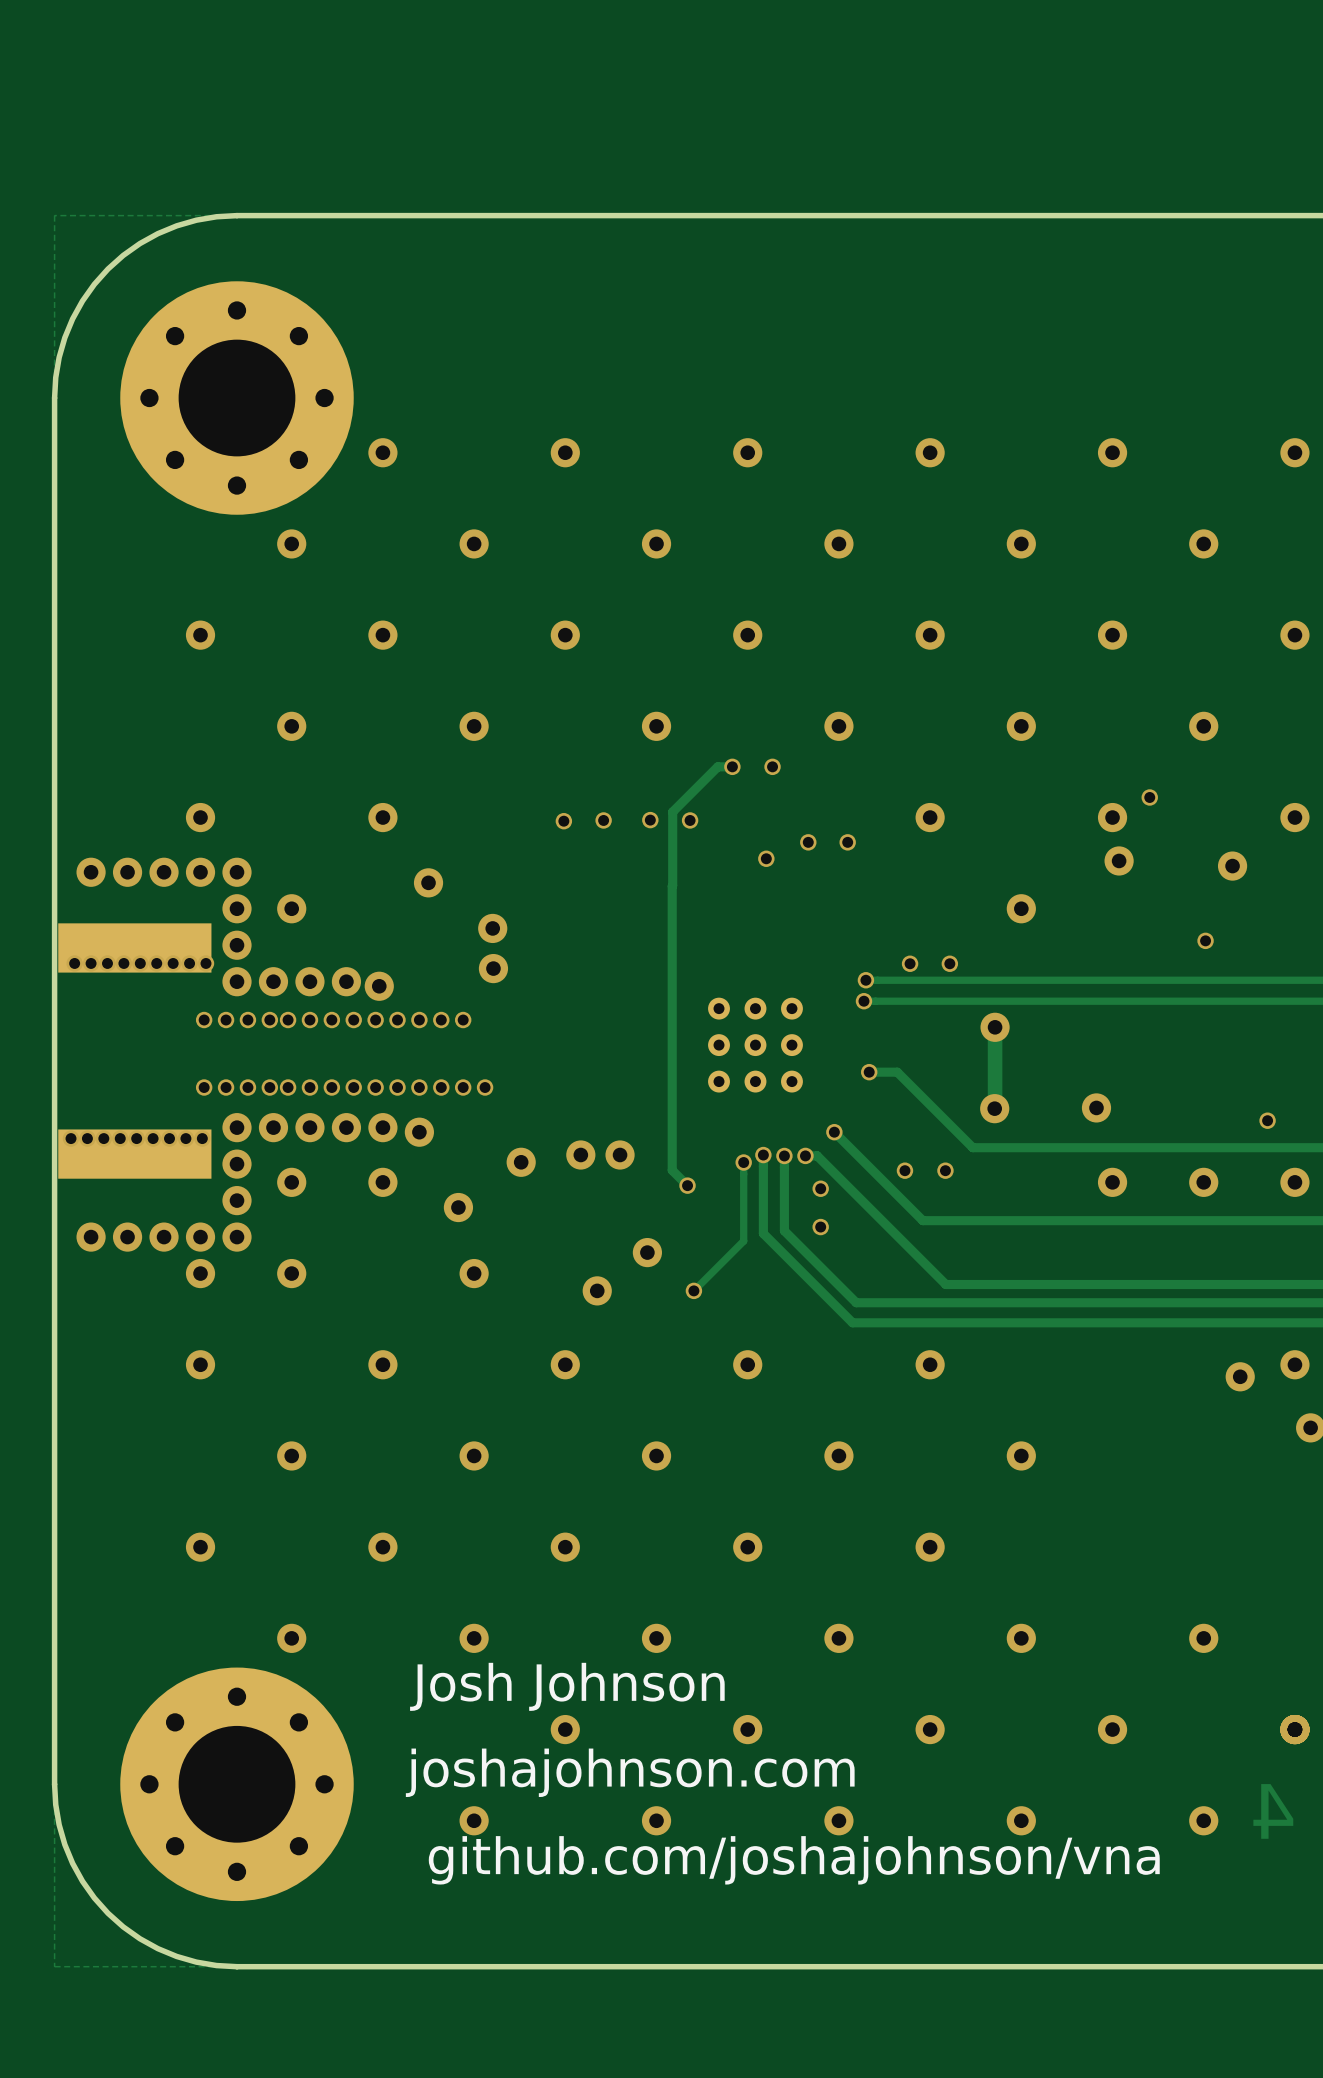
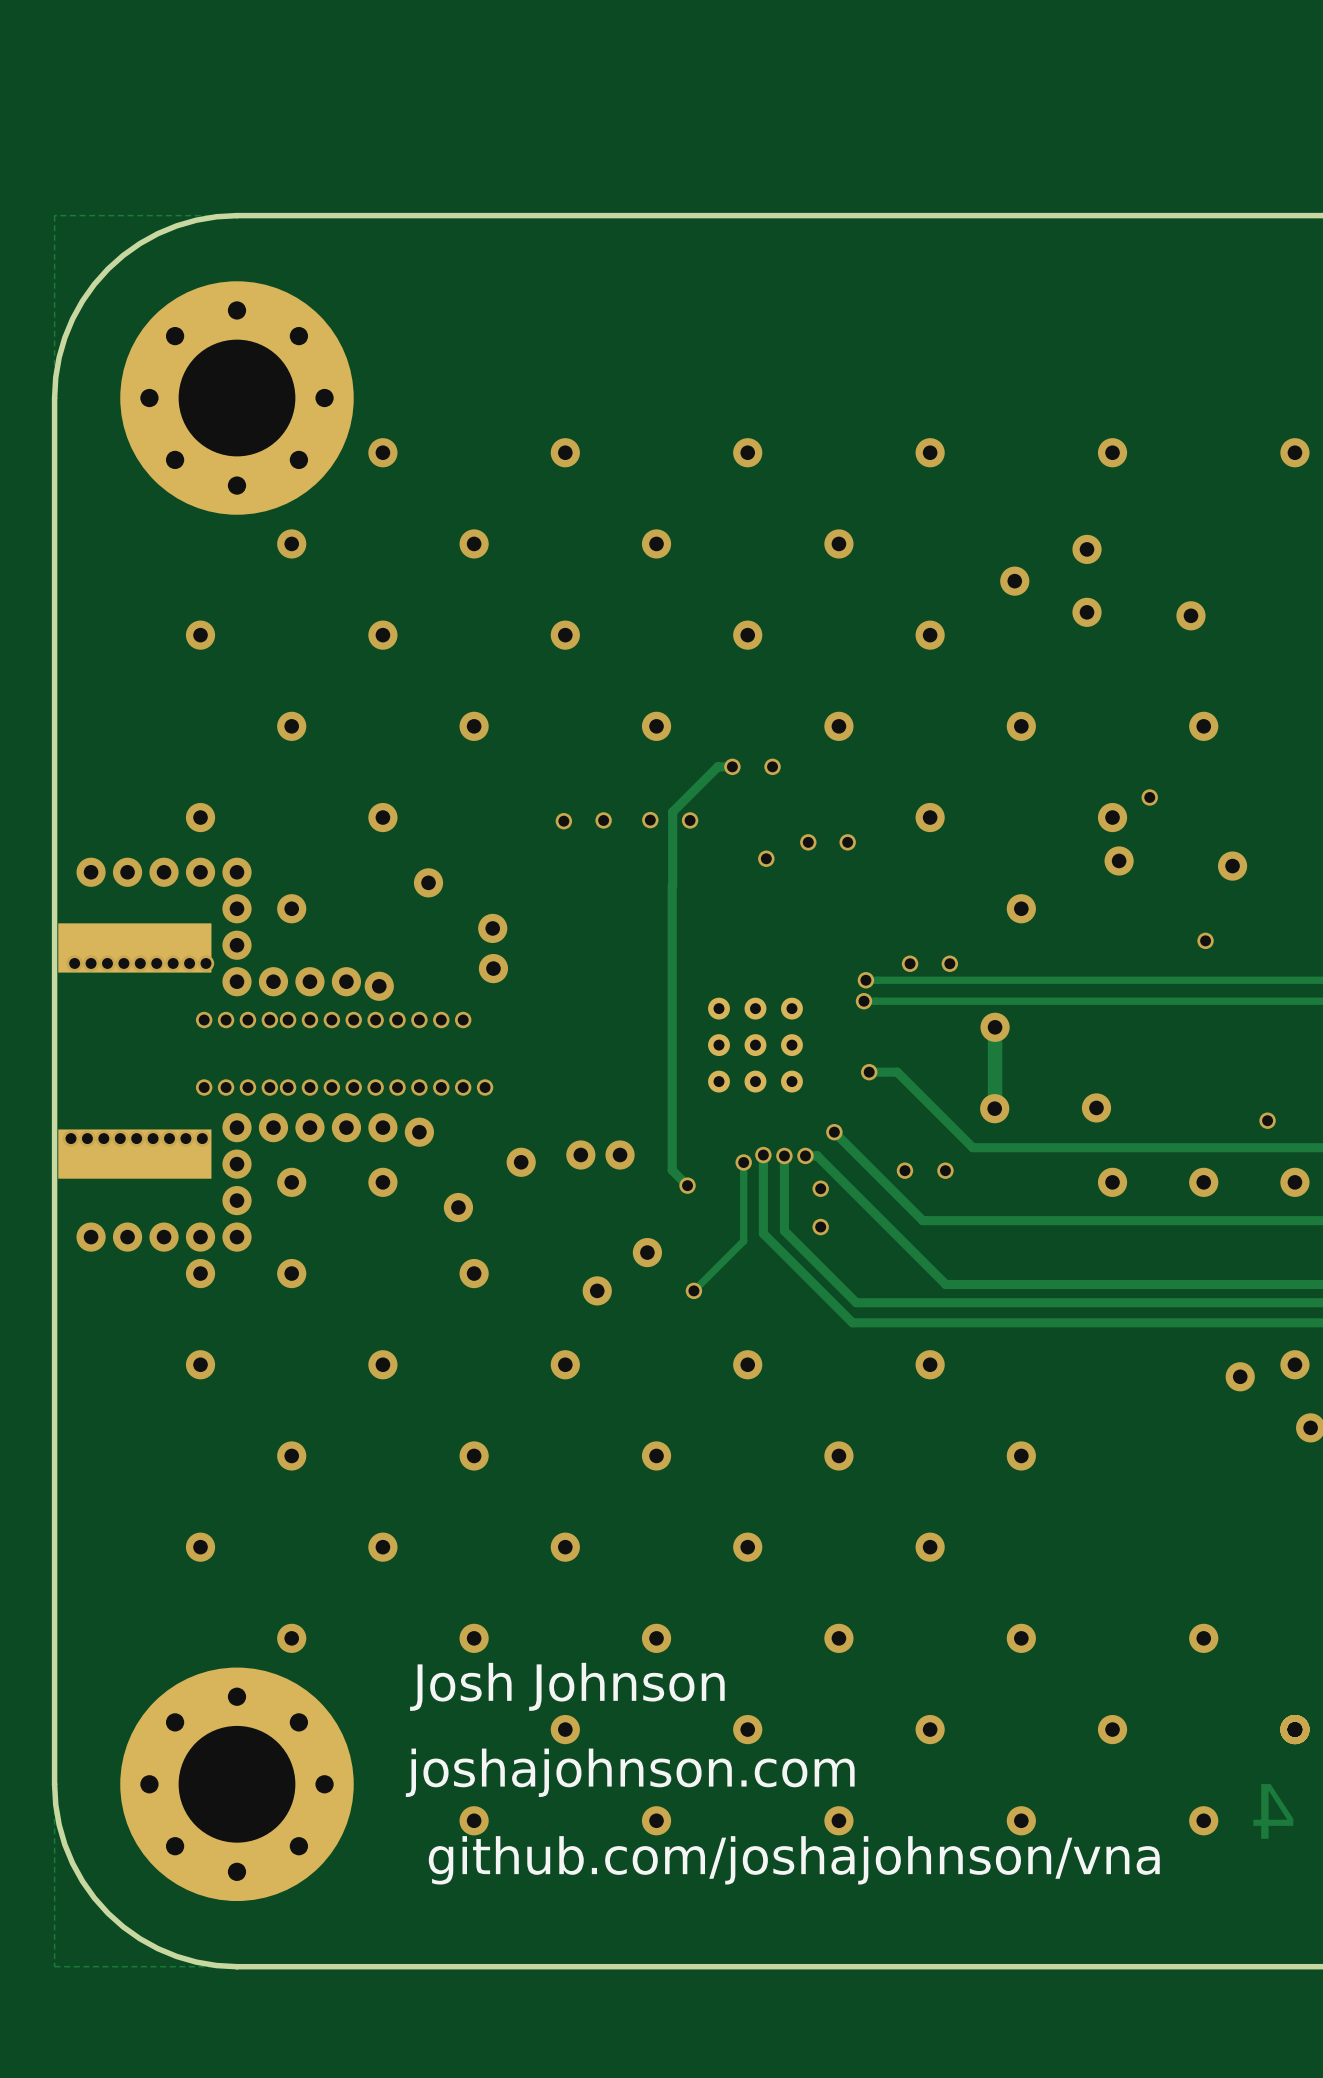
via: (1021, 543) -> none
via: (1203, 543) -> none
via: none -> (1087, 549)
via: none -> (1014, 581)
via: none -> (1190, 615)
via position: (1112, 635) -> (1087, 612)
via: (1294, 635) -> none
via: (1294, 817) -> none

